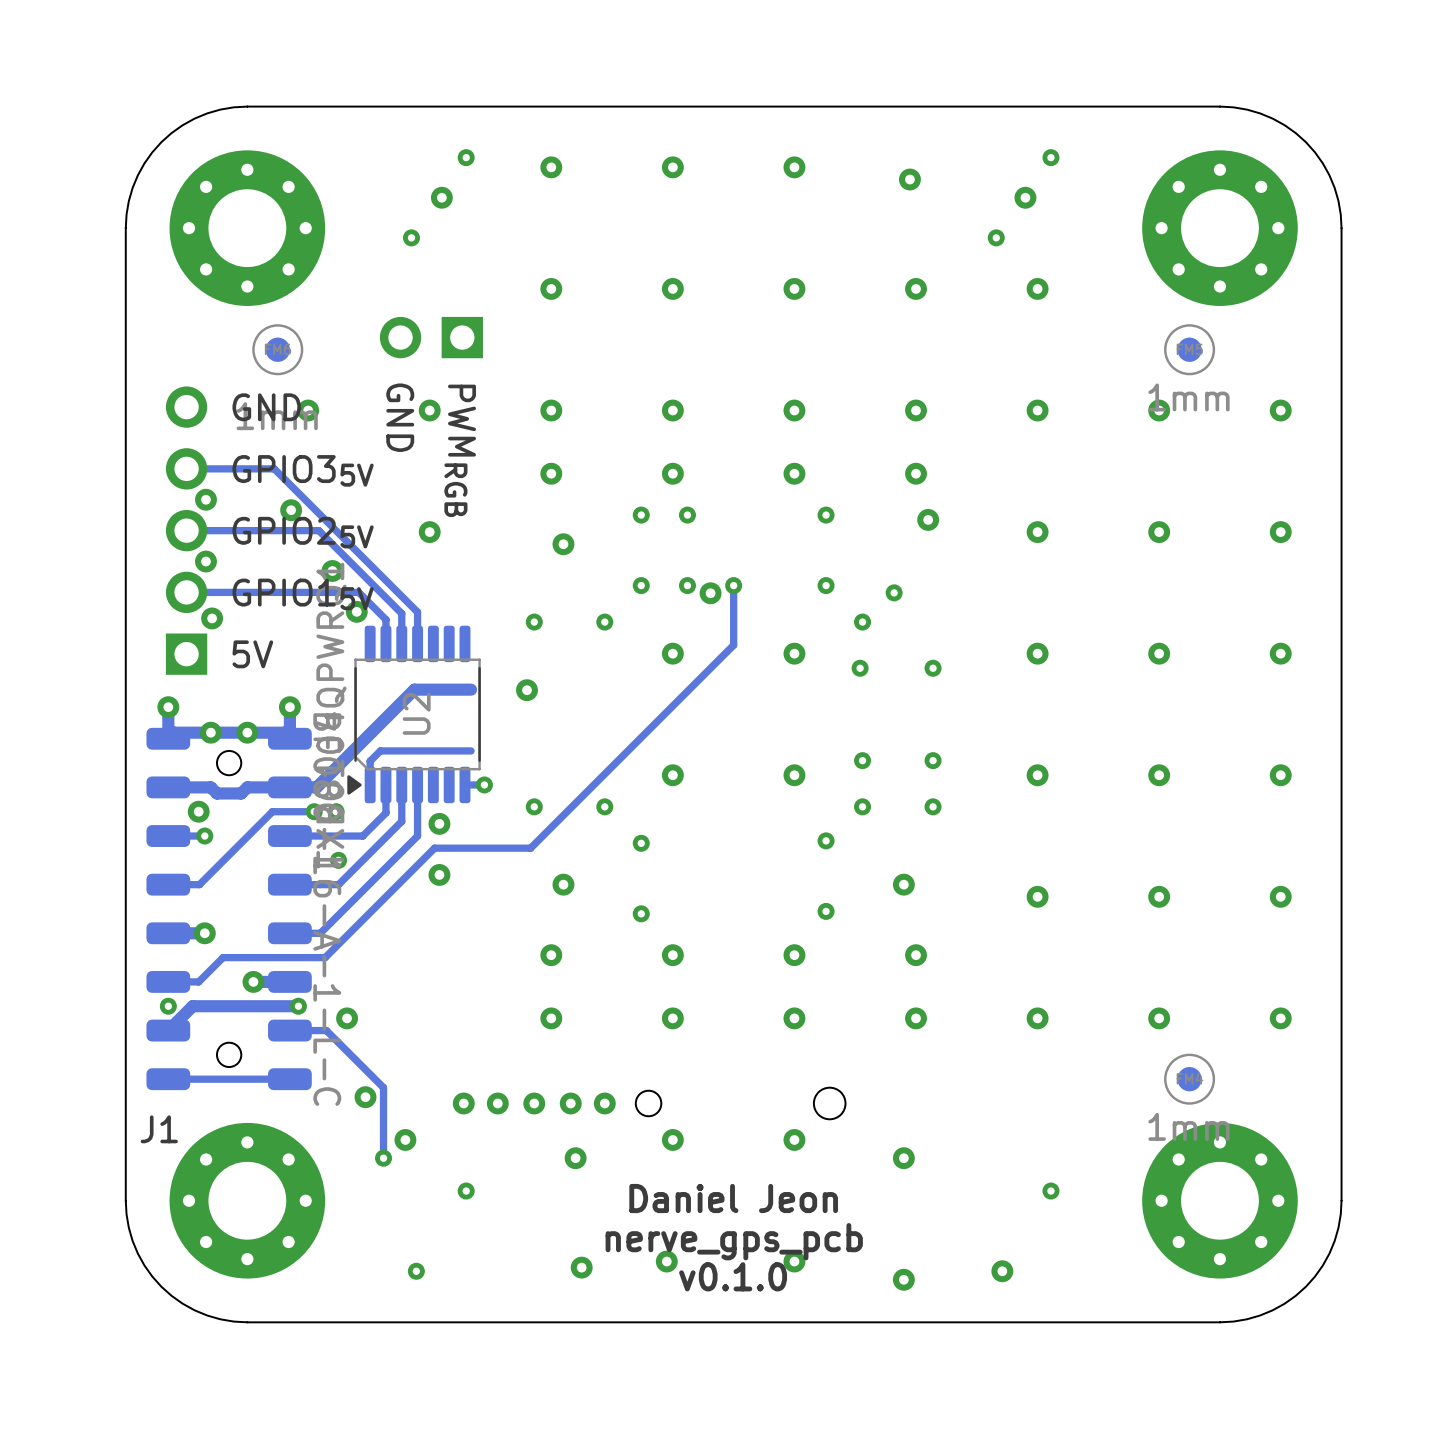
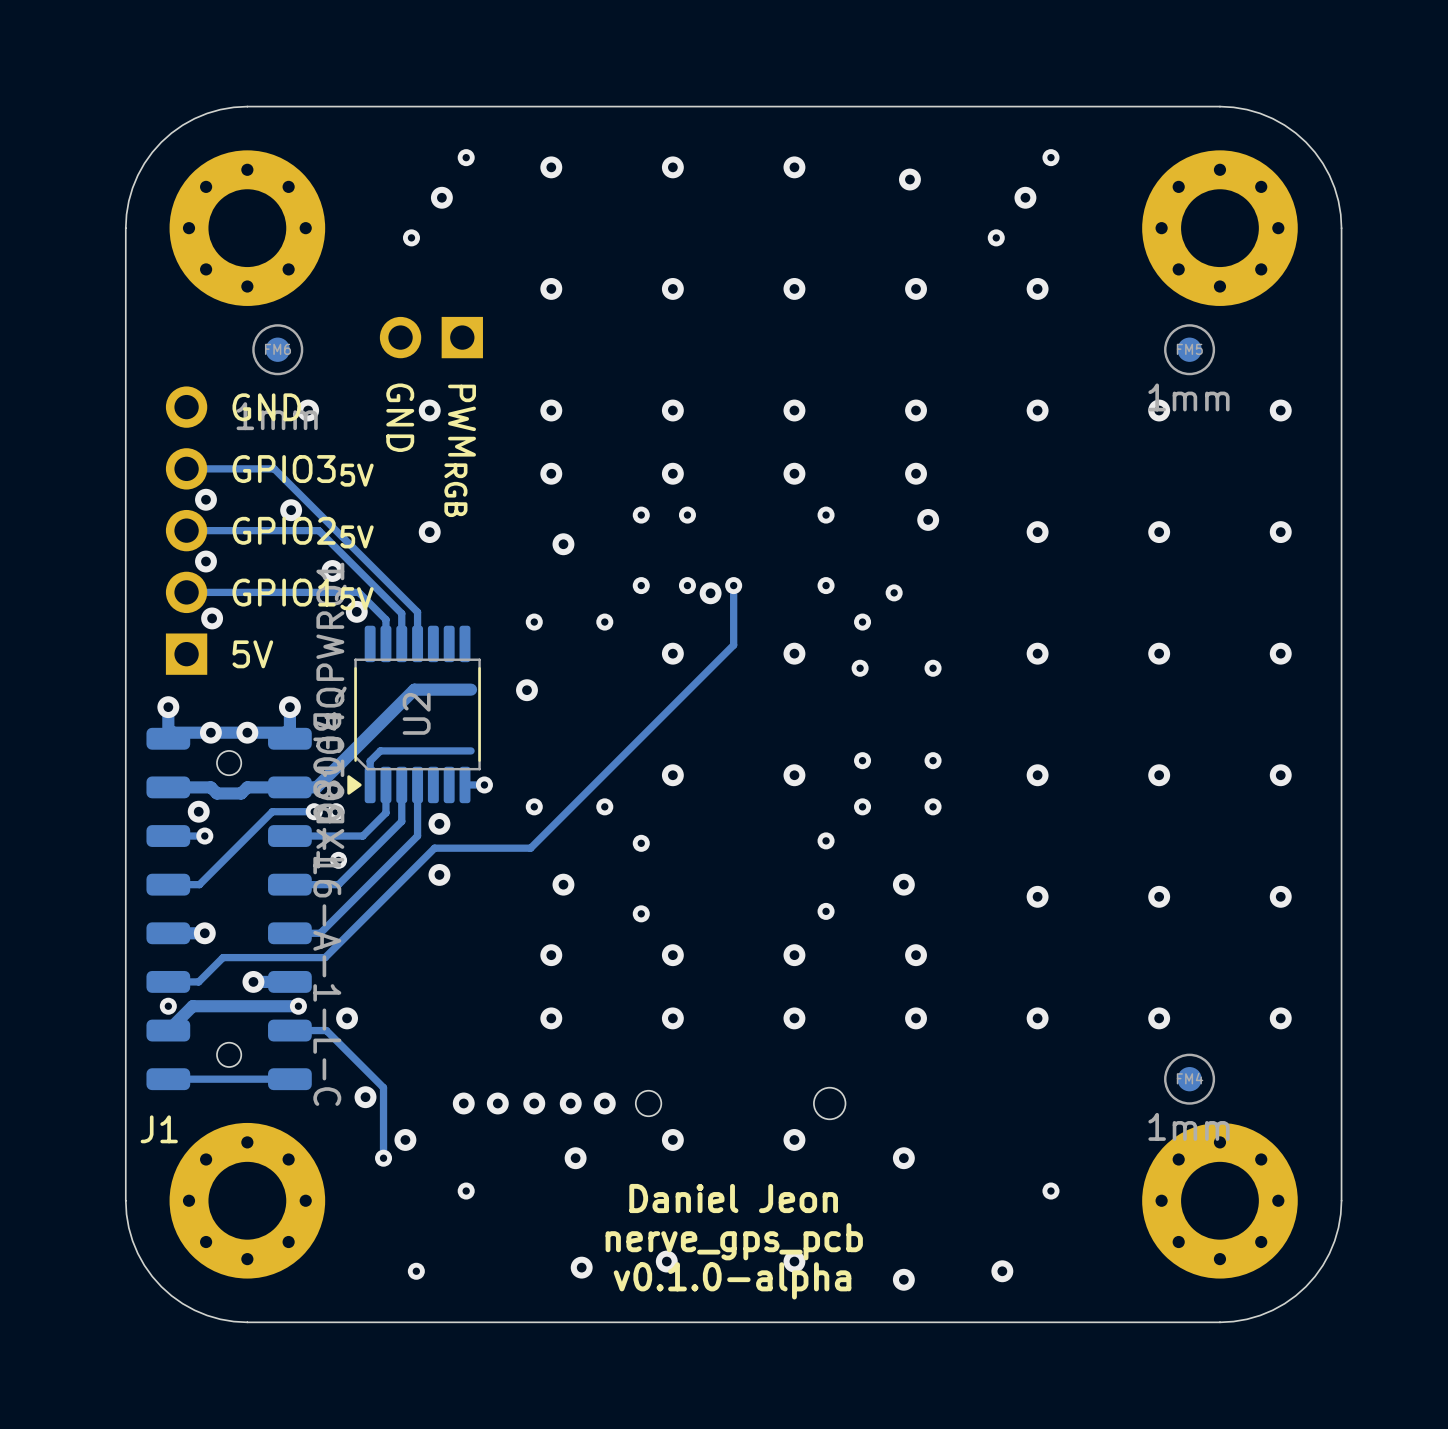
text: v0.1.0 (733, 1276) -> v0.1.0-alpha (732, 1280)

